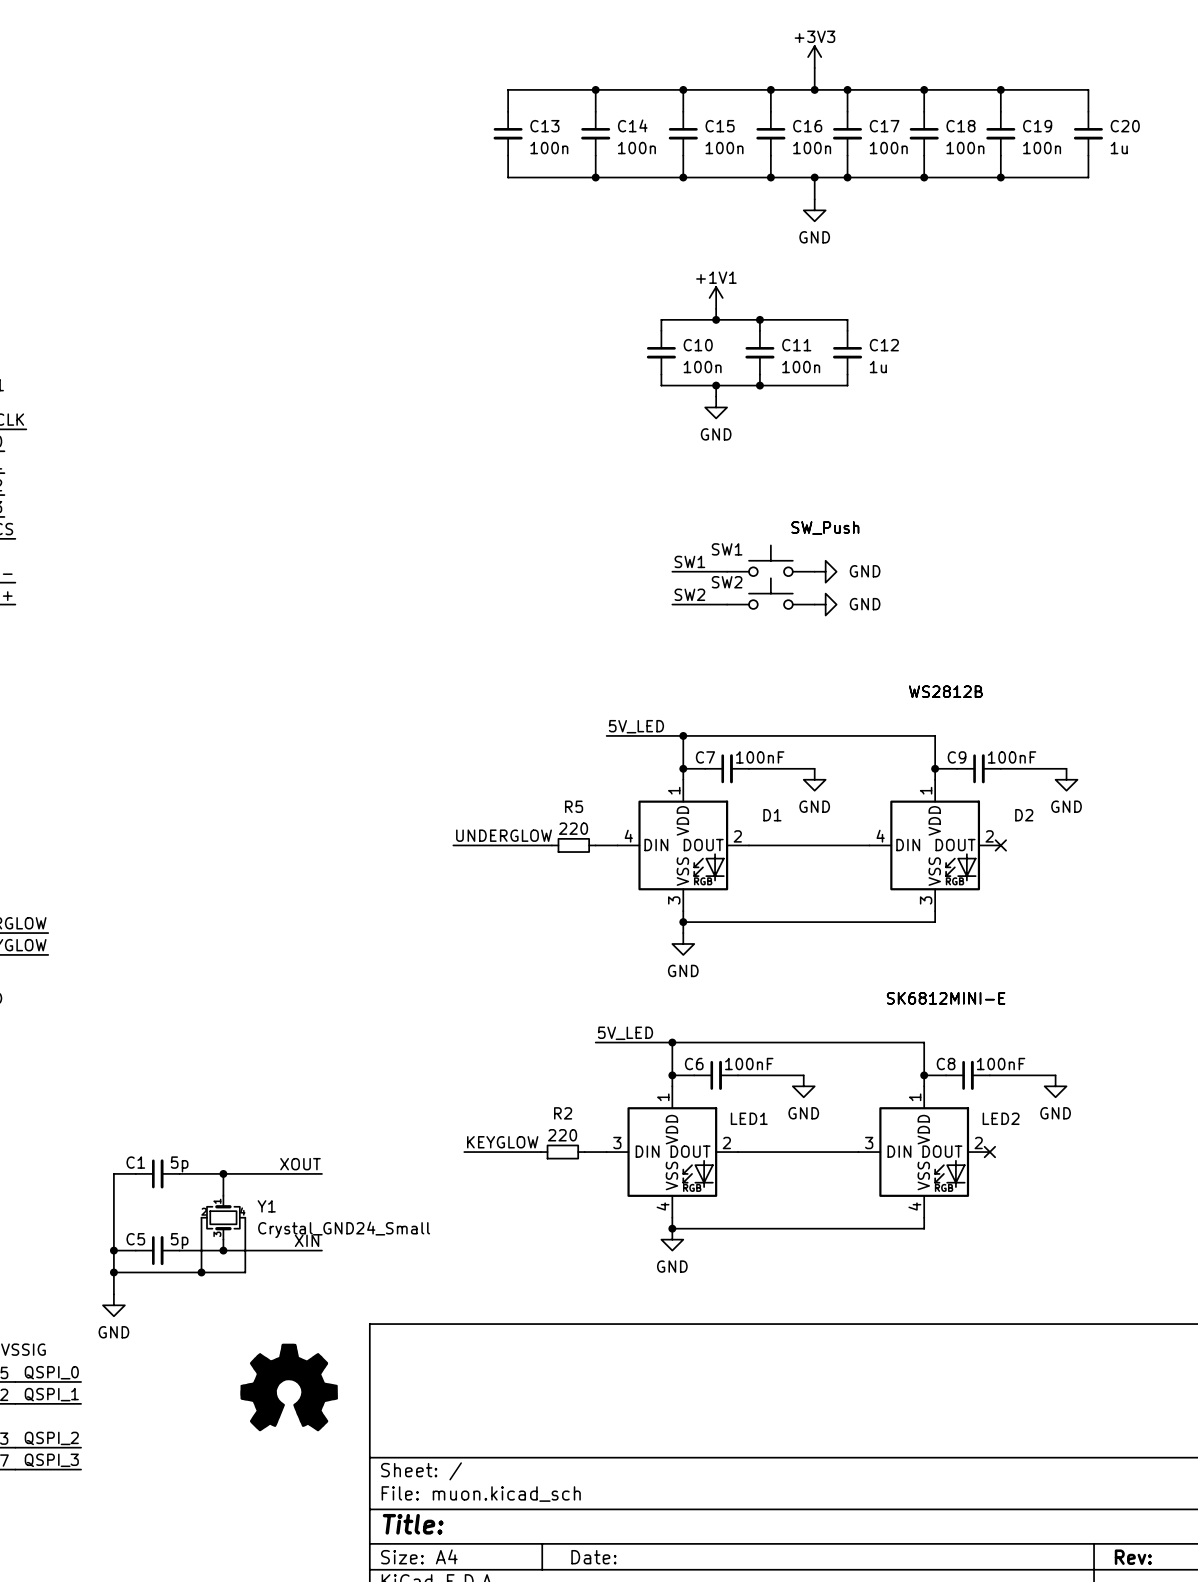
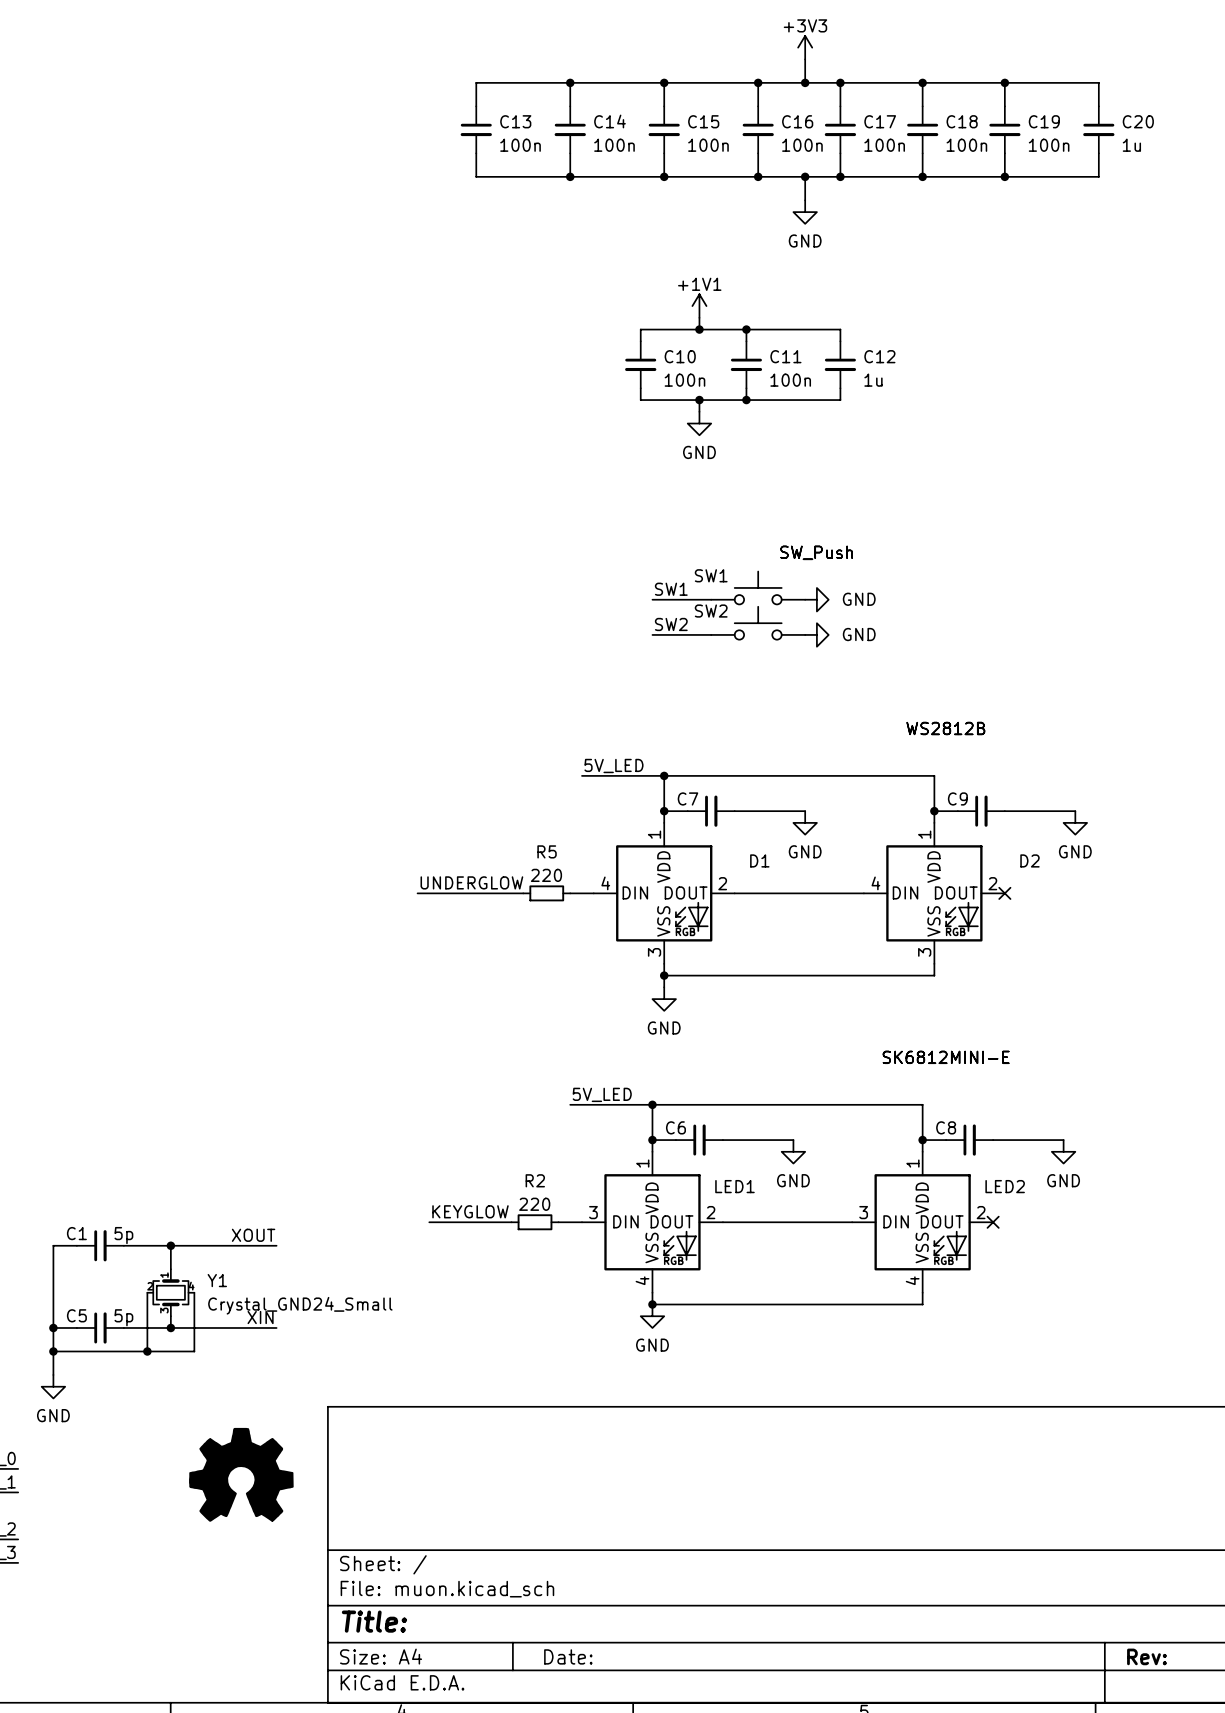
C7 value: 100nF (760, 757) -> none
C9 value: 100nF (1012, 757) -> none
C6 value: 100nF (749, 1064) -> none
C8 value: 100nF (1001, 1064) -> none

